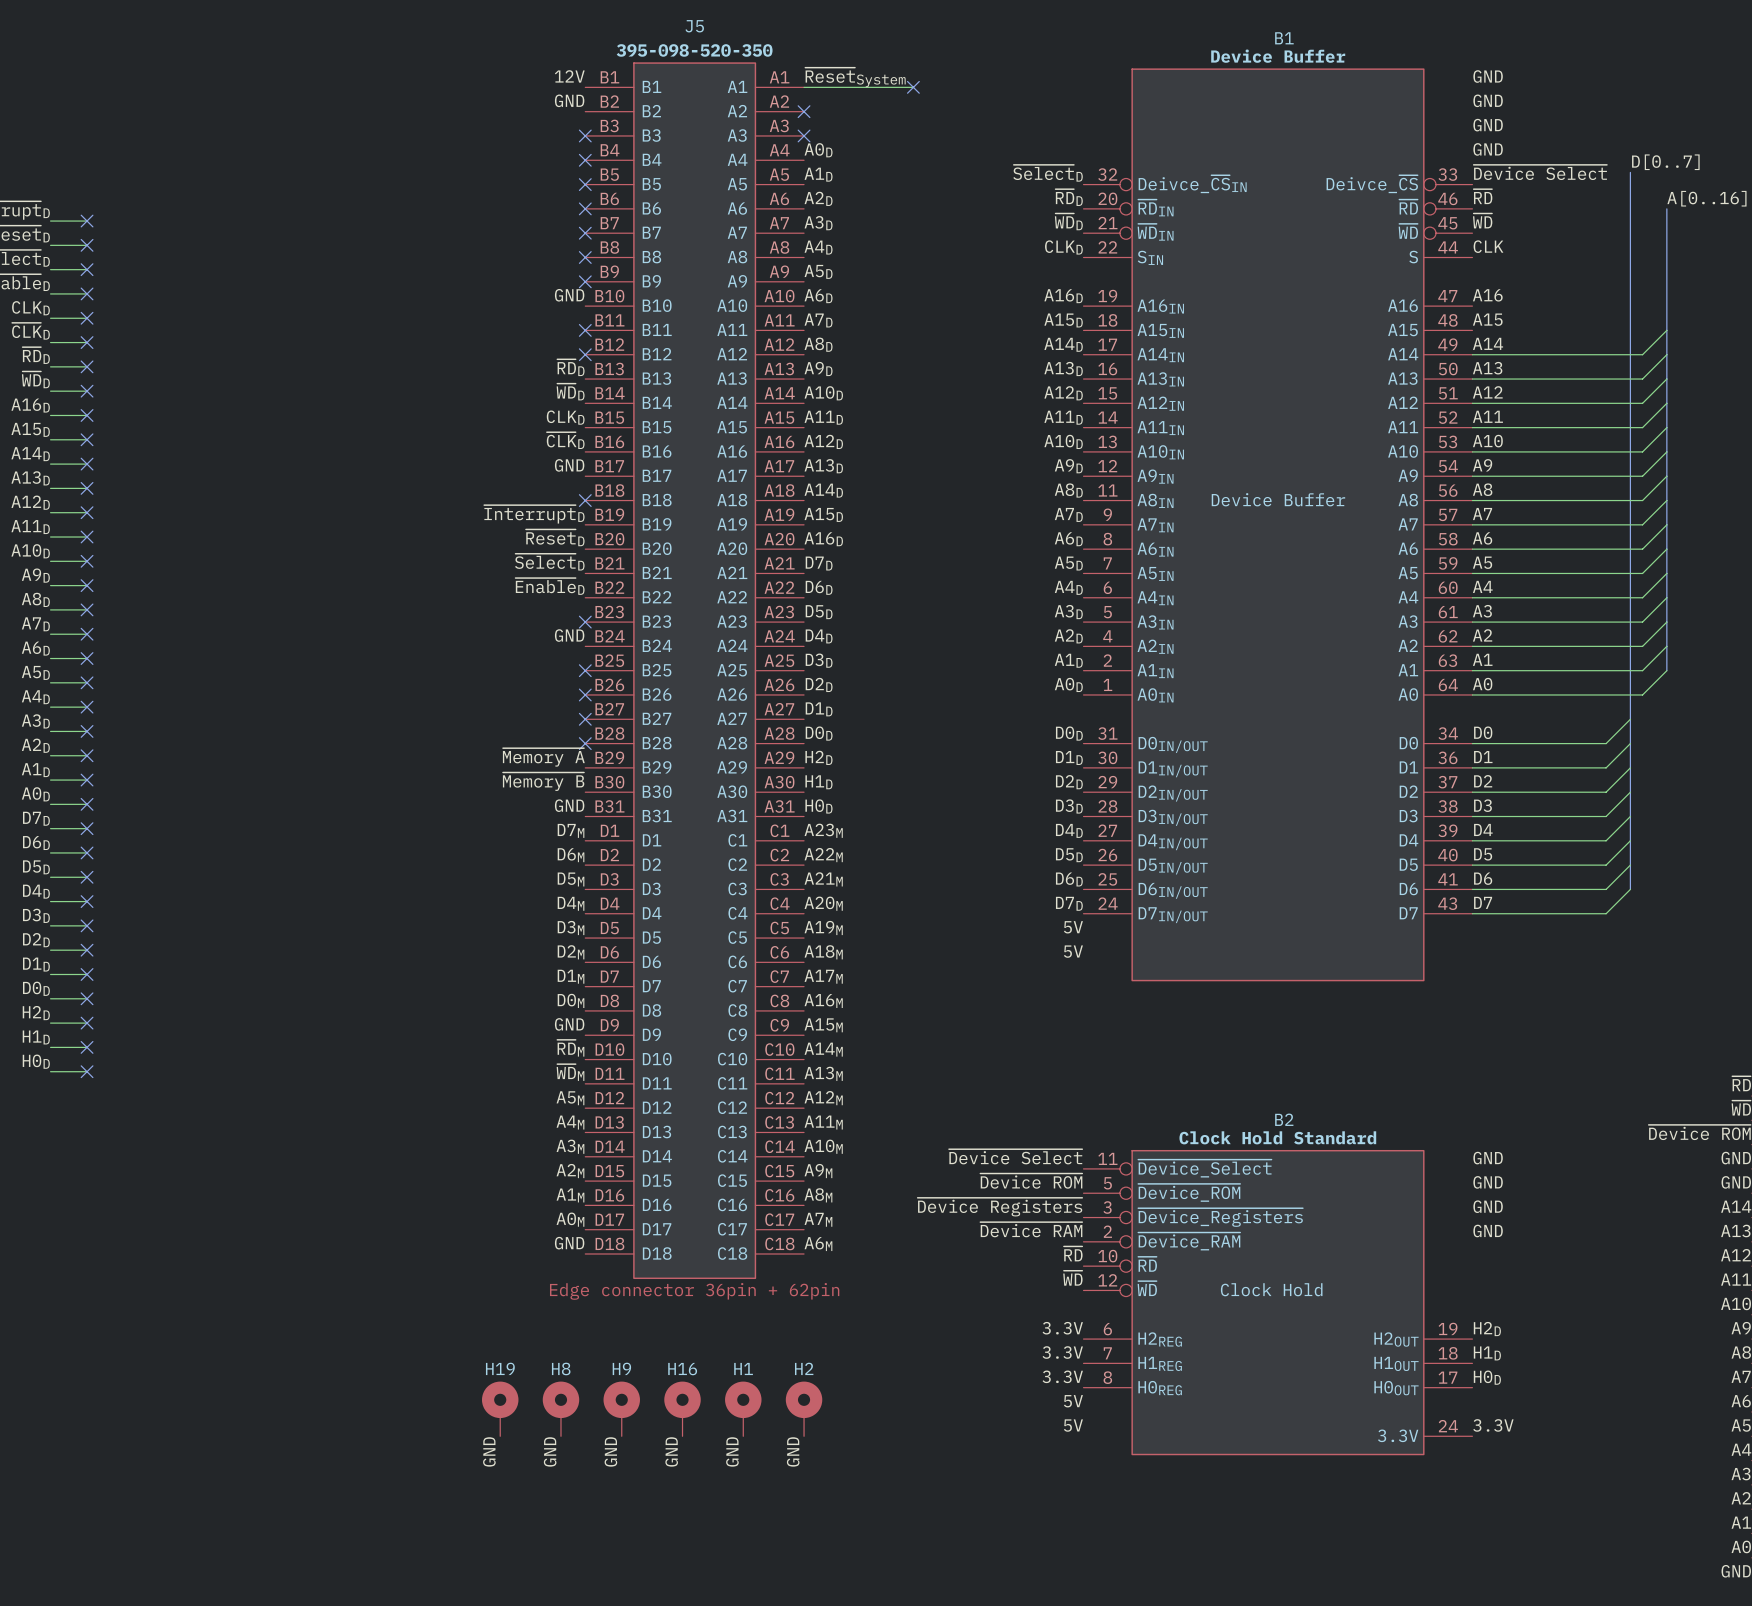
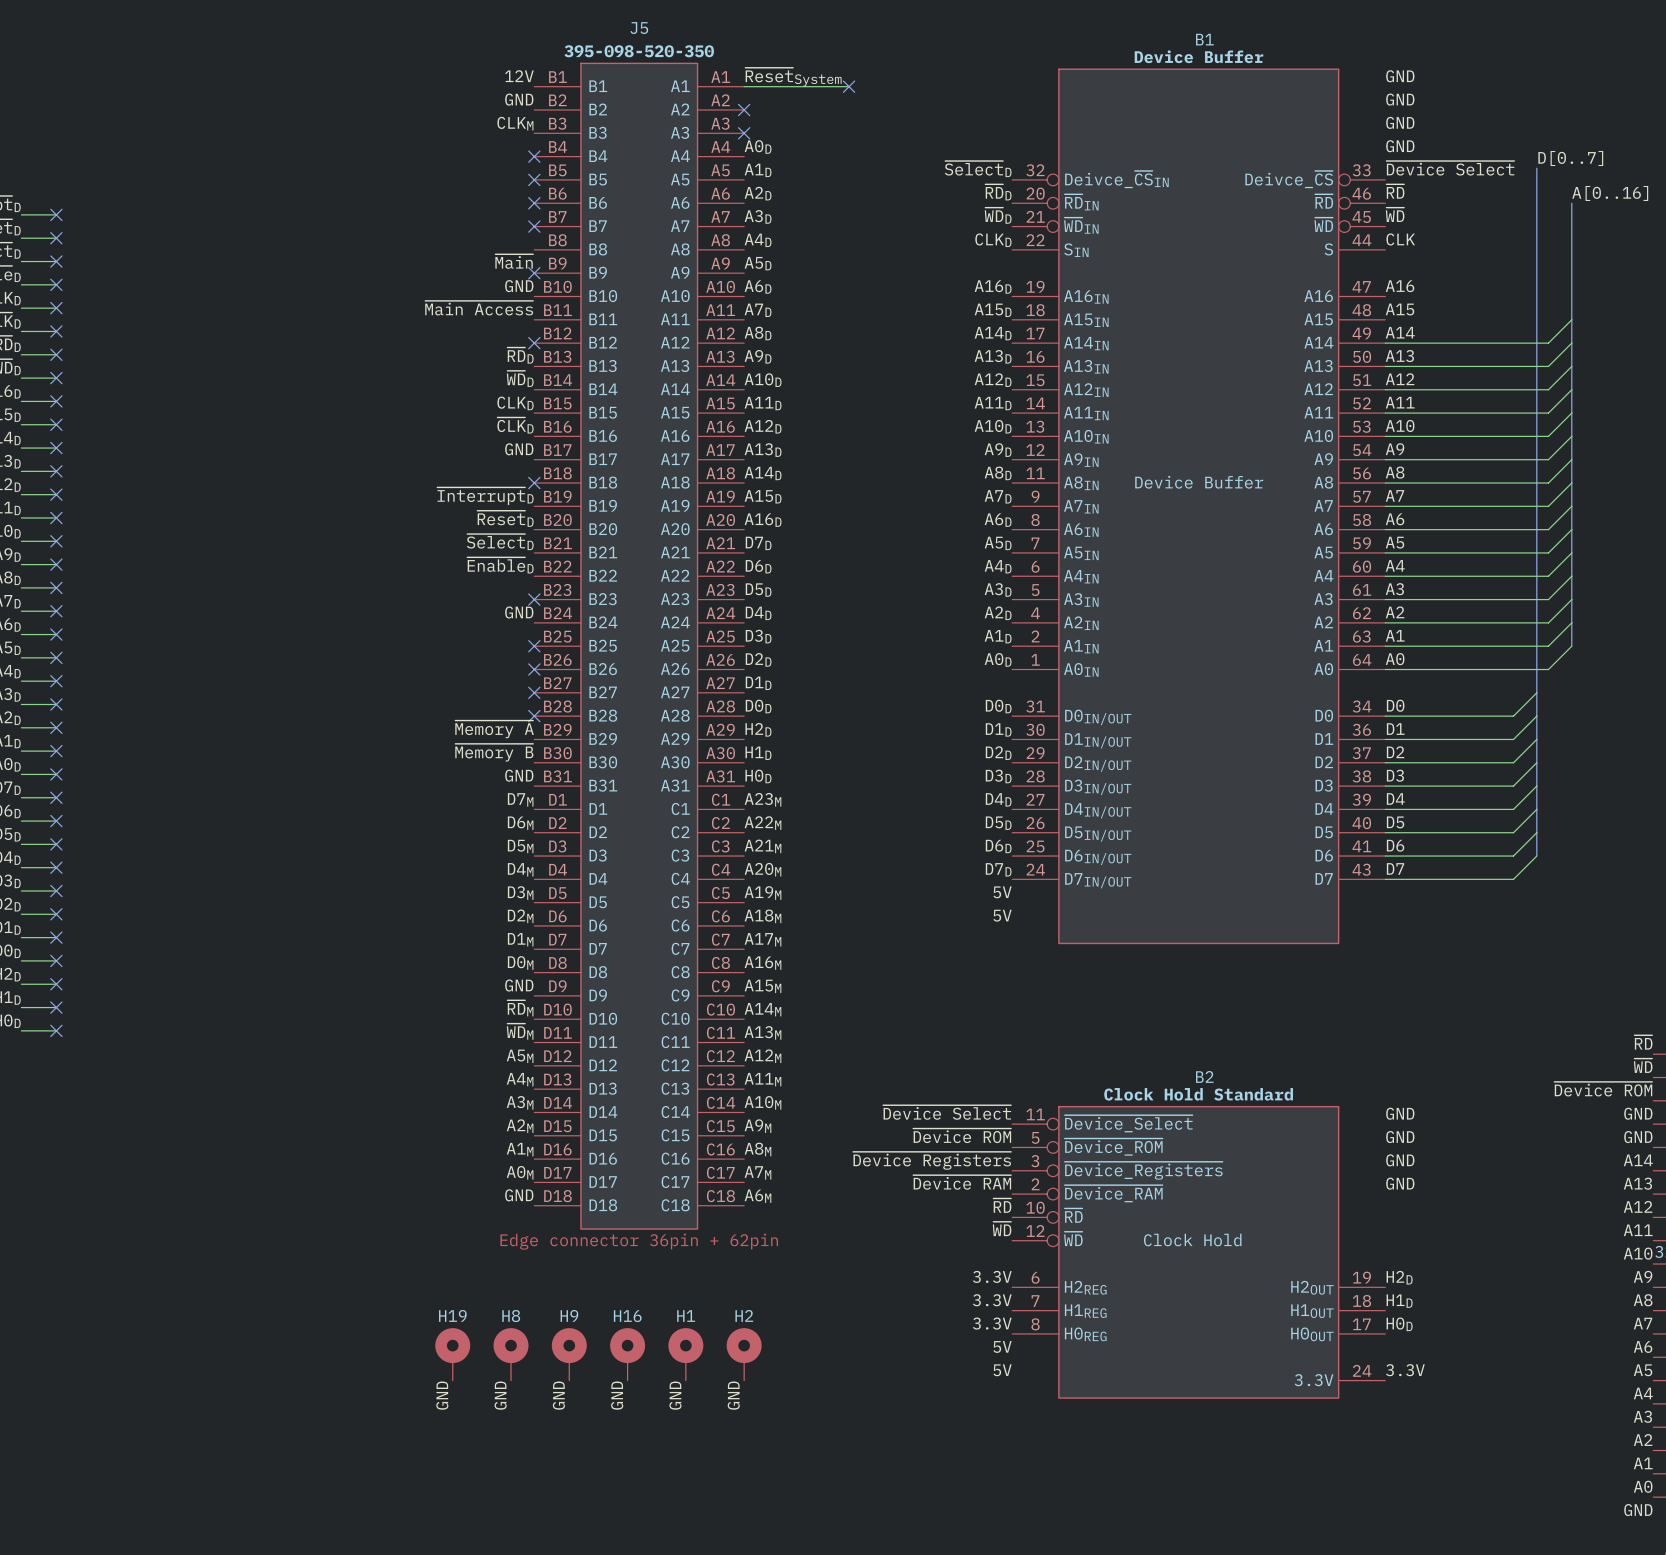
label: none -> CLKM (515, 123)
no-connect mark: (585, 135) -> none
no-connect mark: (585, 257) -> none
label: none -> ~{Main} (514, 261)
label: none -> ~{Main Access} (479, 308)
no-connect mark: (585, 330) -> none

